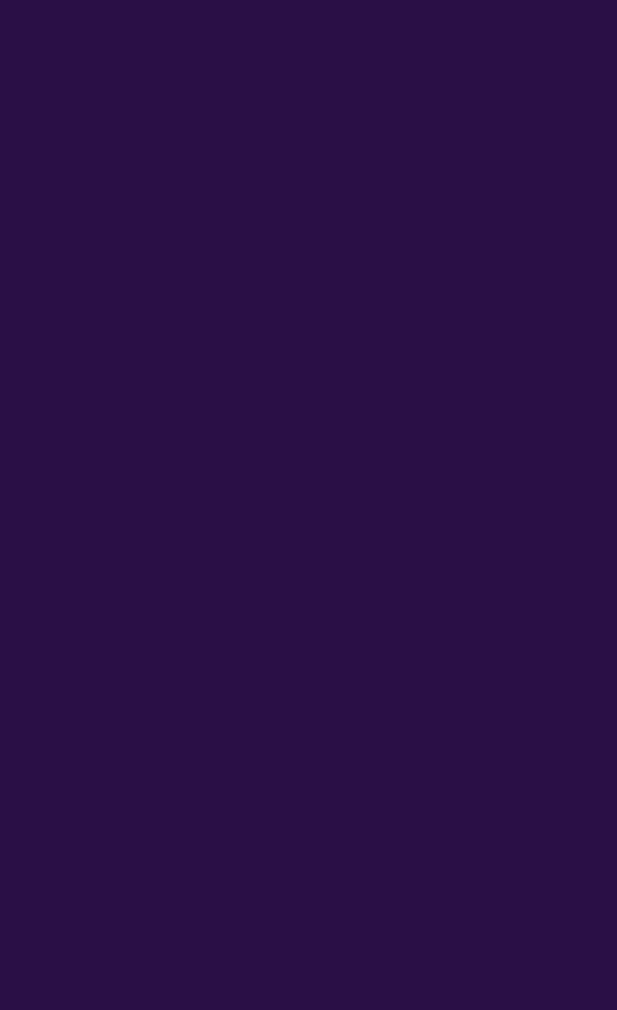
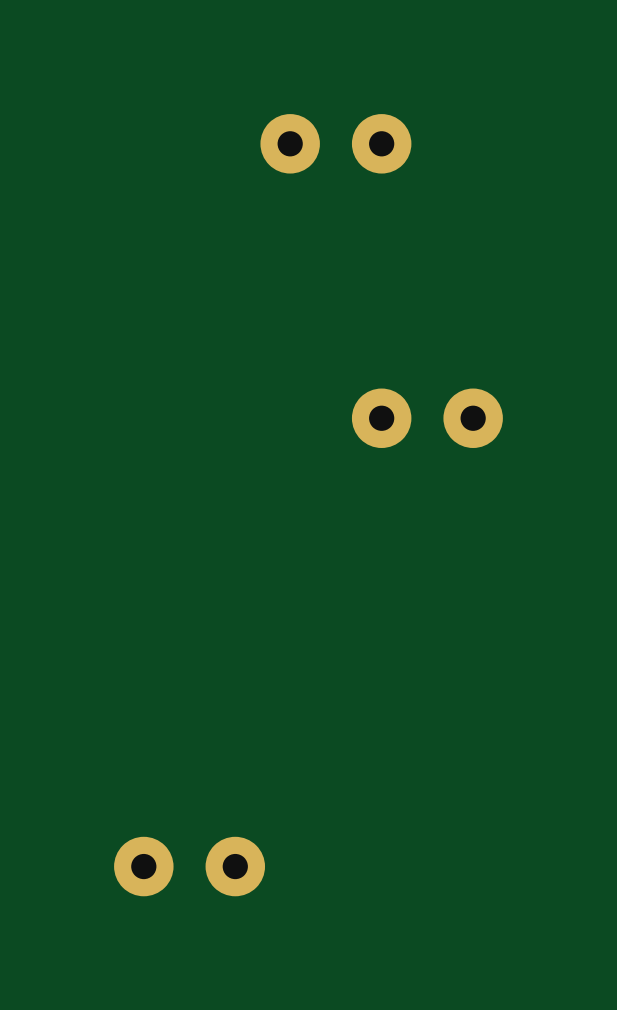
part: none -> (335, 143)
part: none -> (427, 418)
part: none -> (189, 866)

